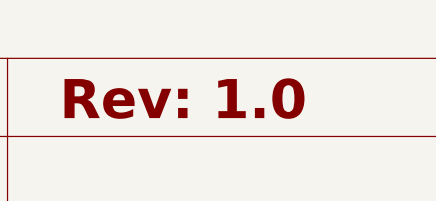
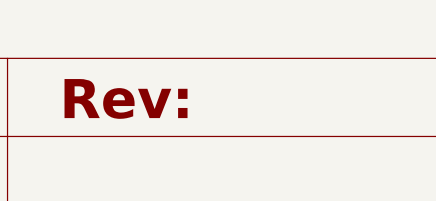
title block: Rev: 1.0 (184, 98) -> Rev: (126, 98)

